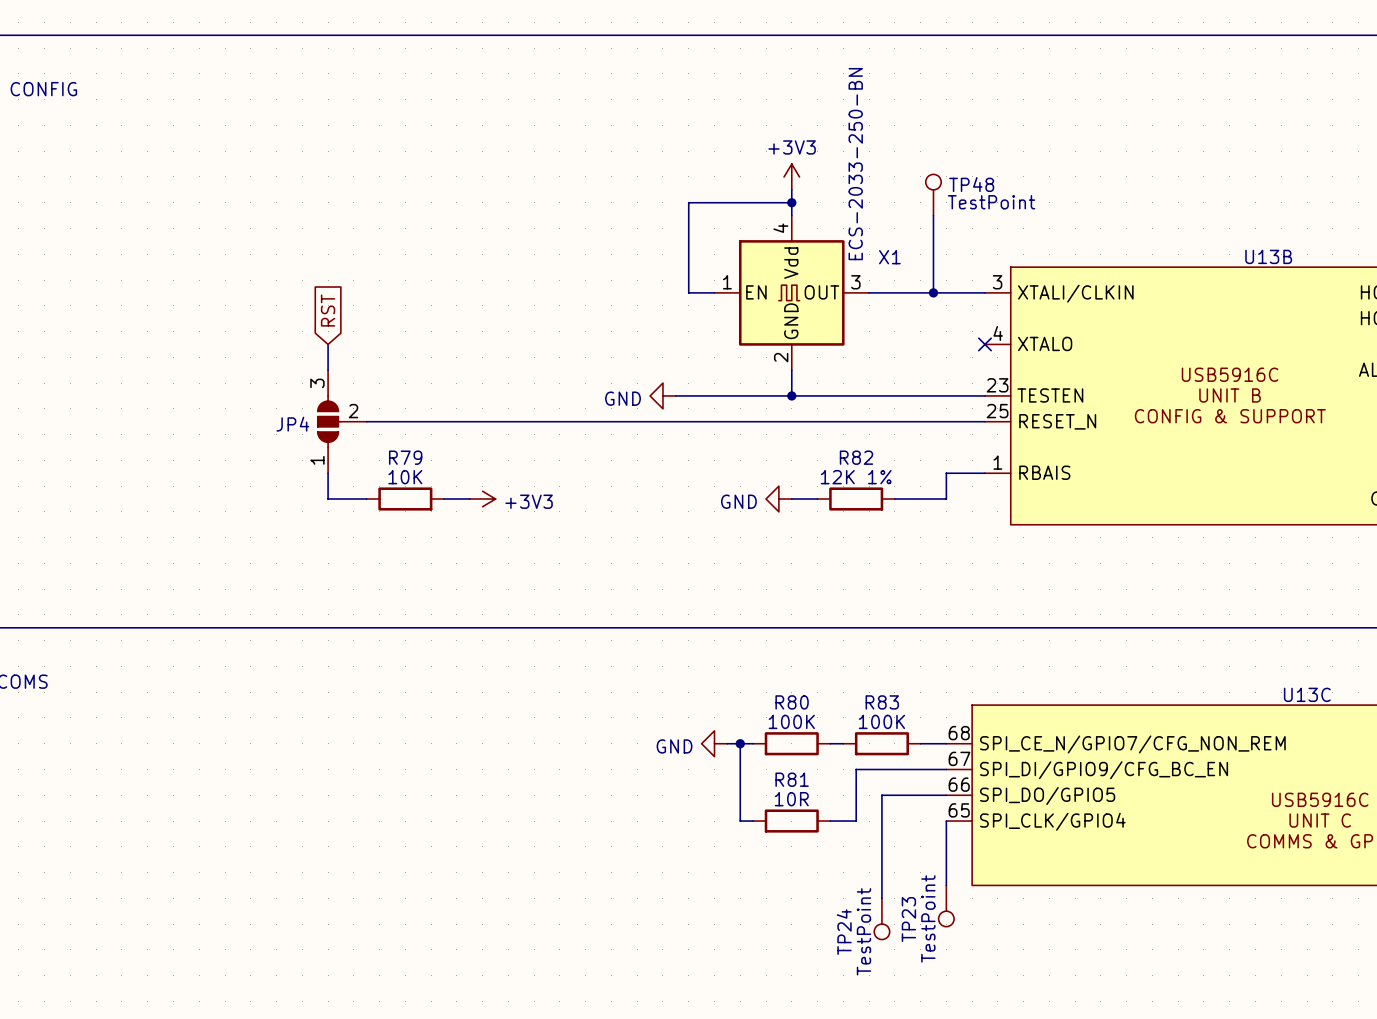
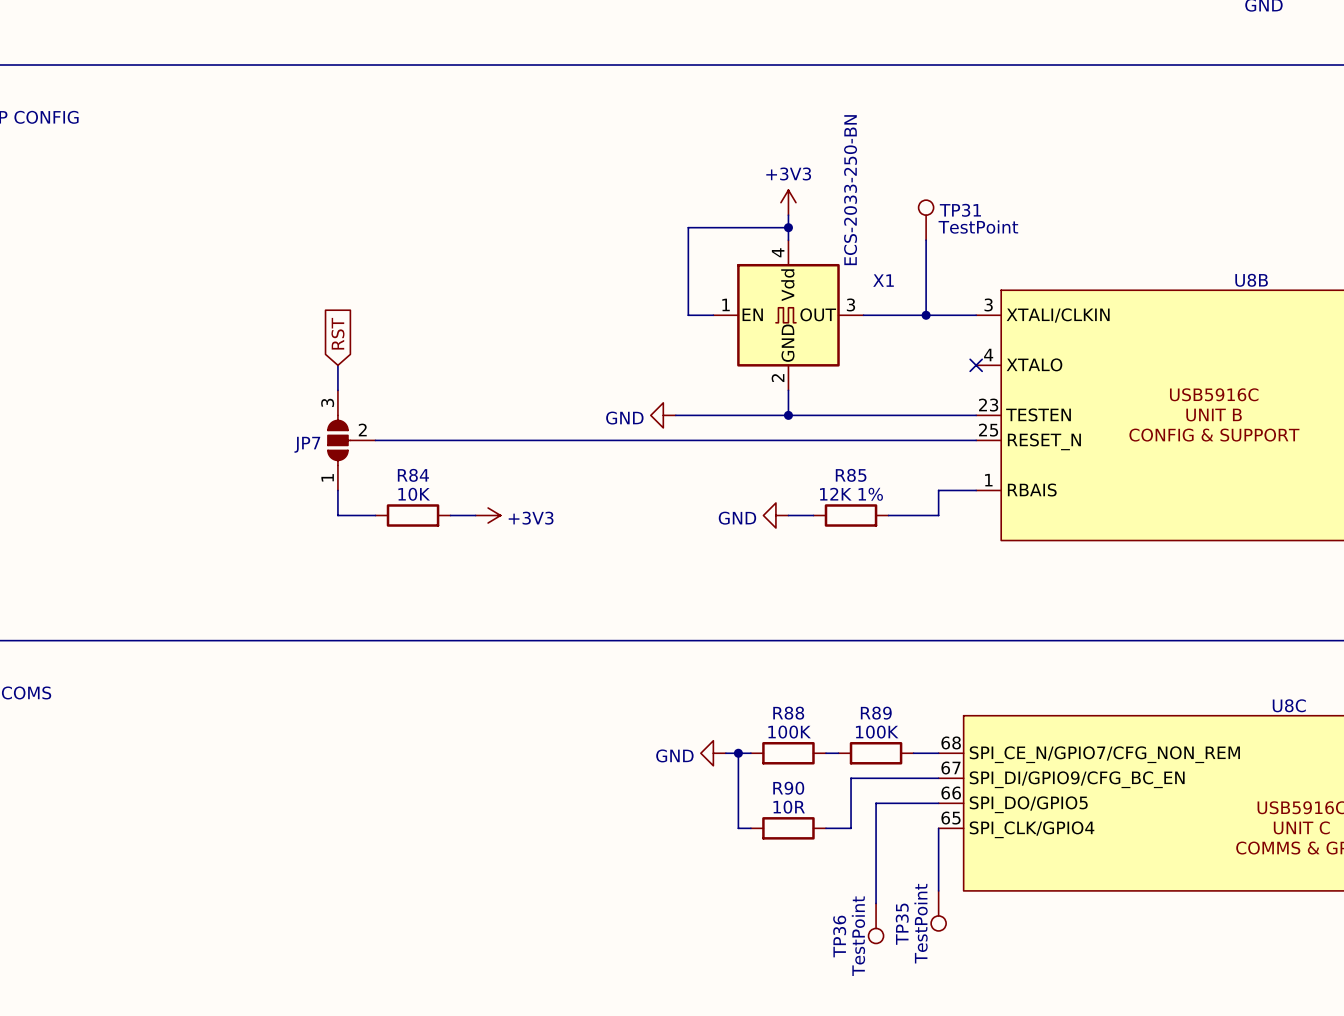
TP48 name: TP48 (971, 184) -> TP31 (960, 210)
U13B name: U13B (1268, 256) -> U8B (1251, 280)
JP4 name: JP4 (292, 424) -> JP7 (307, 444)
R79 name: R79 (405, 457) -> R84 (413, 475)
R82 name: R82 (856, 457) -> R85 (851, 475)
U13C name: U13C (1307, 694) -> U8C (1289, 705)
R80 name: R80 (792, 702) -> R88 (788, 713)
R83 name: R83 (882, 702) -> R89 (876, 713)
R81 name: R81 (792, 779) -> R90 (788, 788)
TP23 name: TP23 (908, 919) -> TP35 (902, 924)
TP24 name: TP24 (844, 932) -> TP36 (839, 936)

